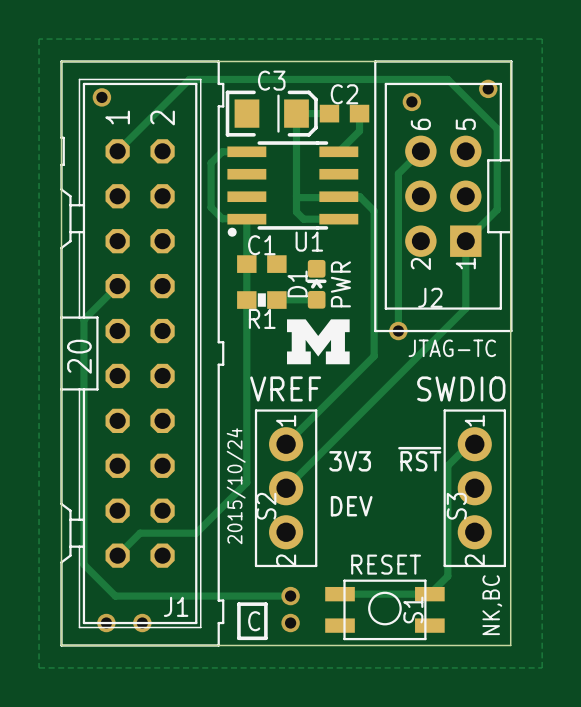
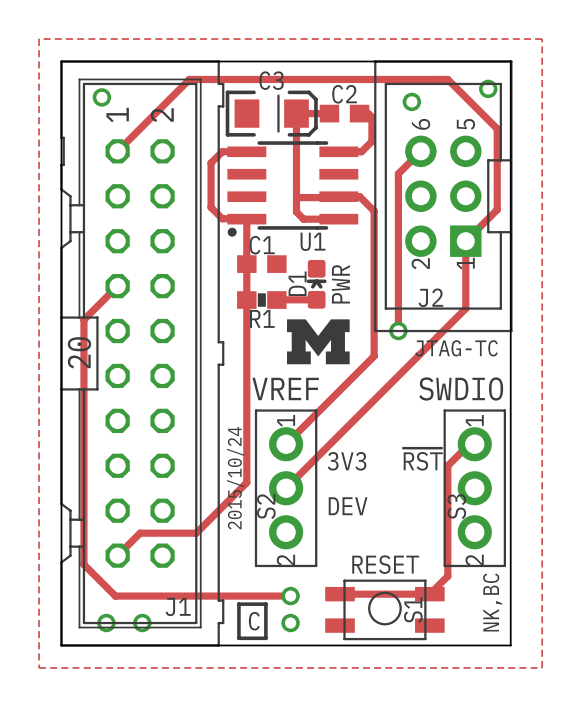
track: (359, 113) (359, 131) (338, 151) -> (368, 113) (371, 116) (371, 141) (361, 151) (338, 151)

